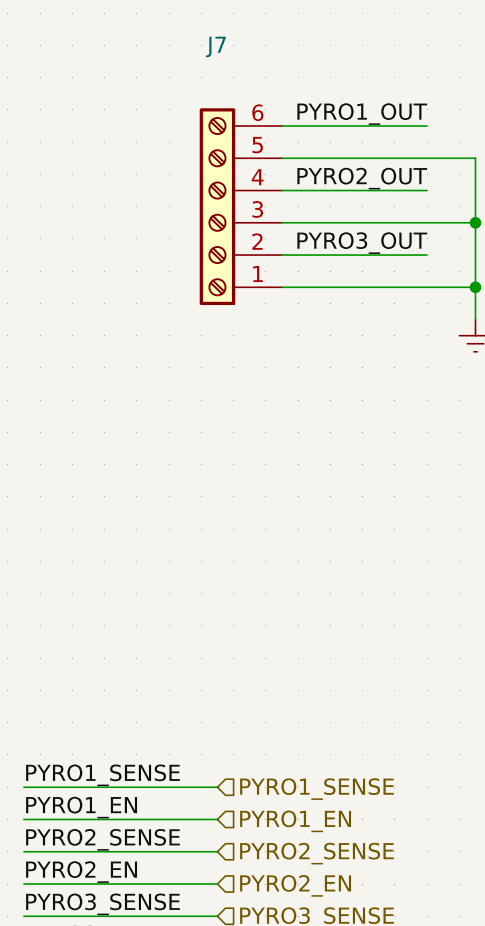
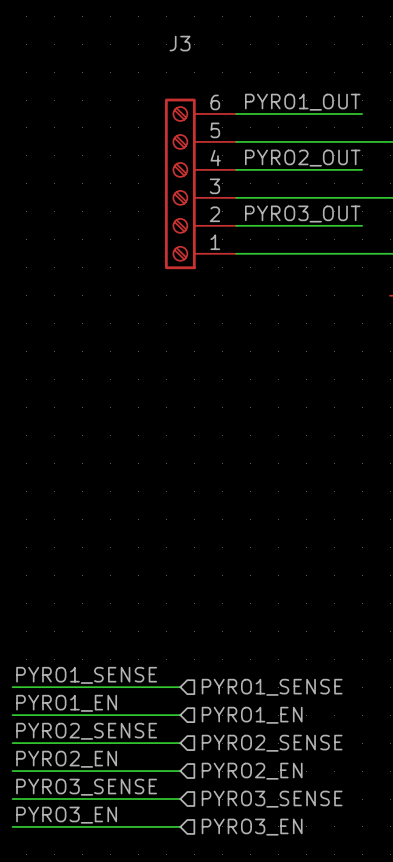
J7 name: J7 (215, 46) -> J3 (180, 43)

